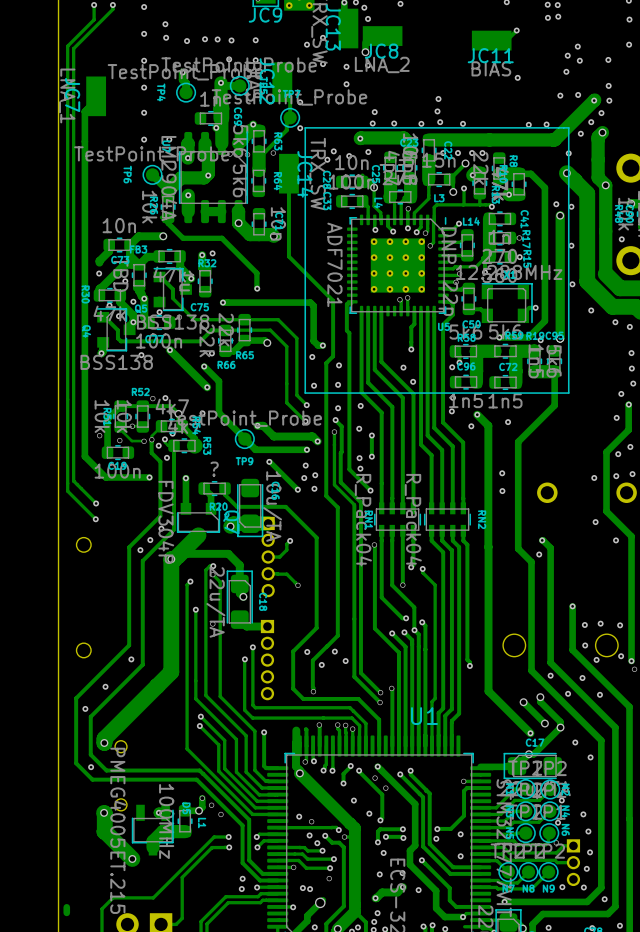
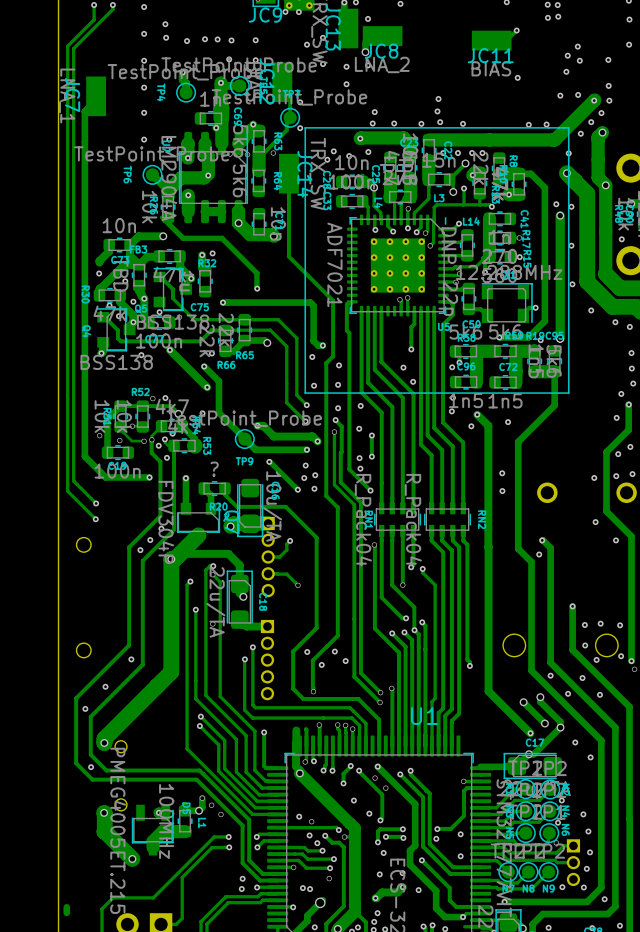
via: (364, 7) -> none
via: none -> (285, 11)
via: none -> (298, 12)

